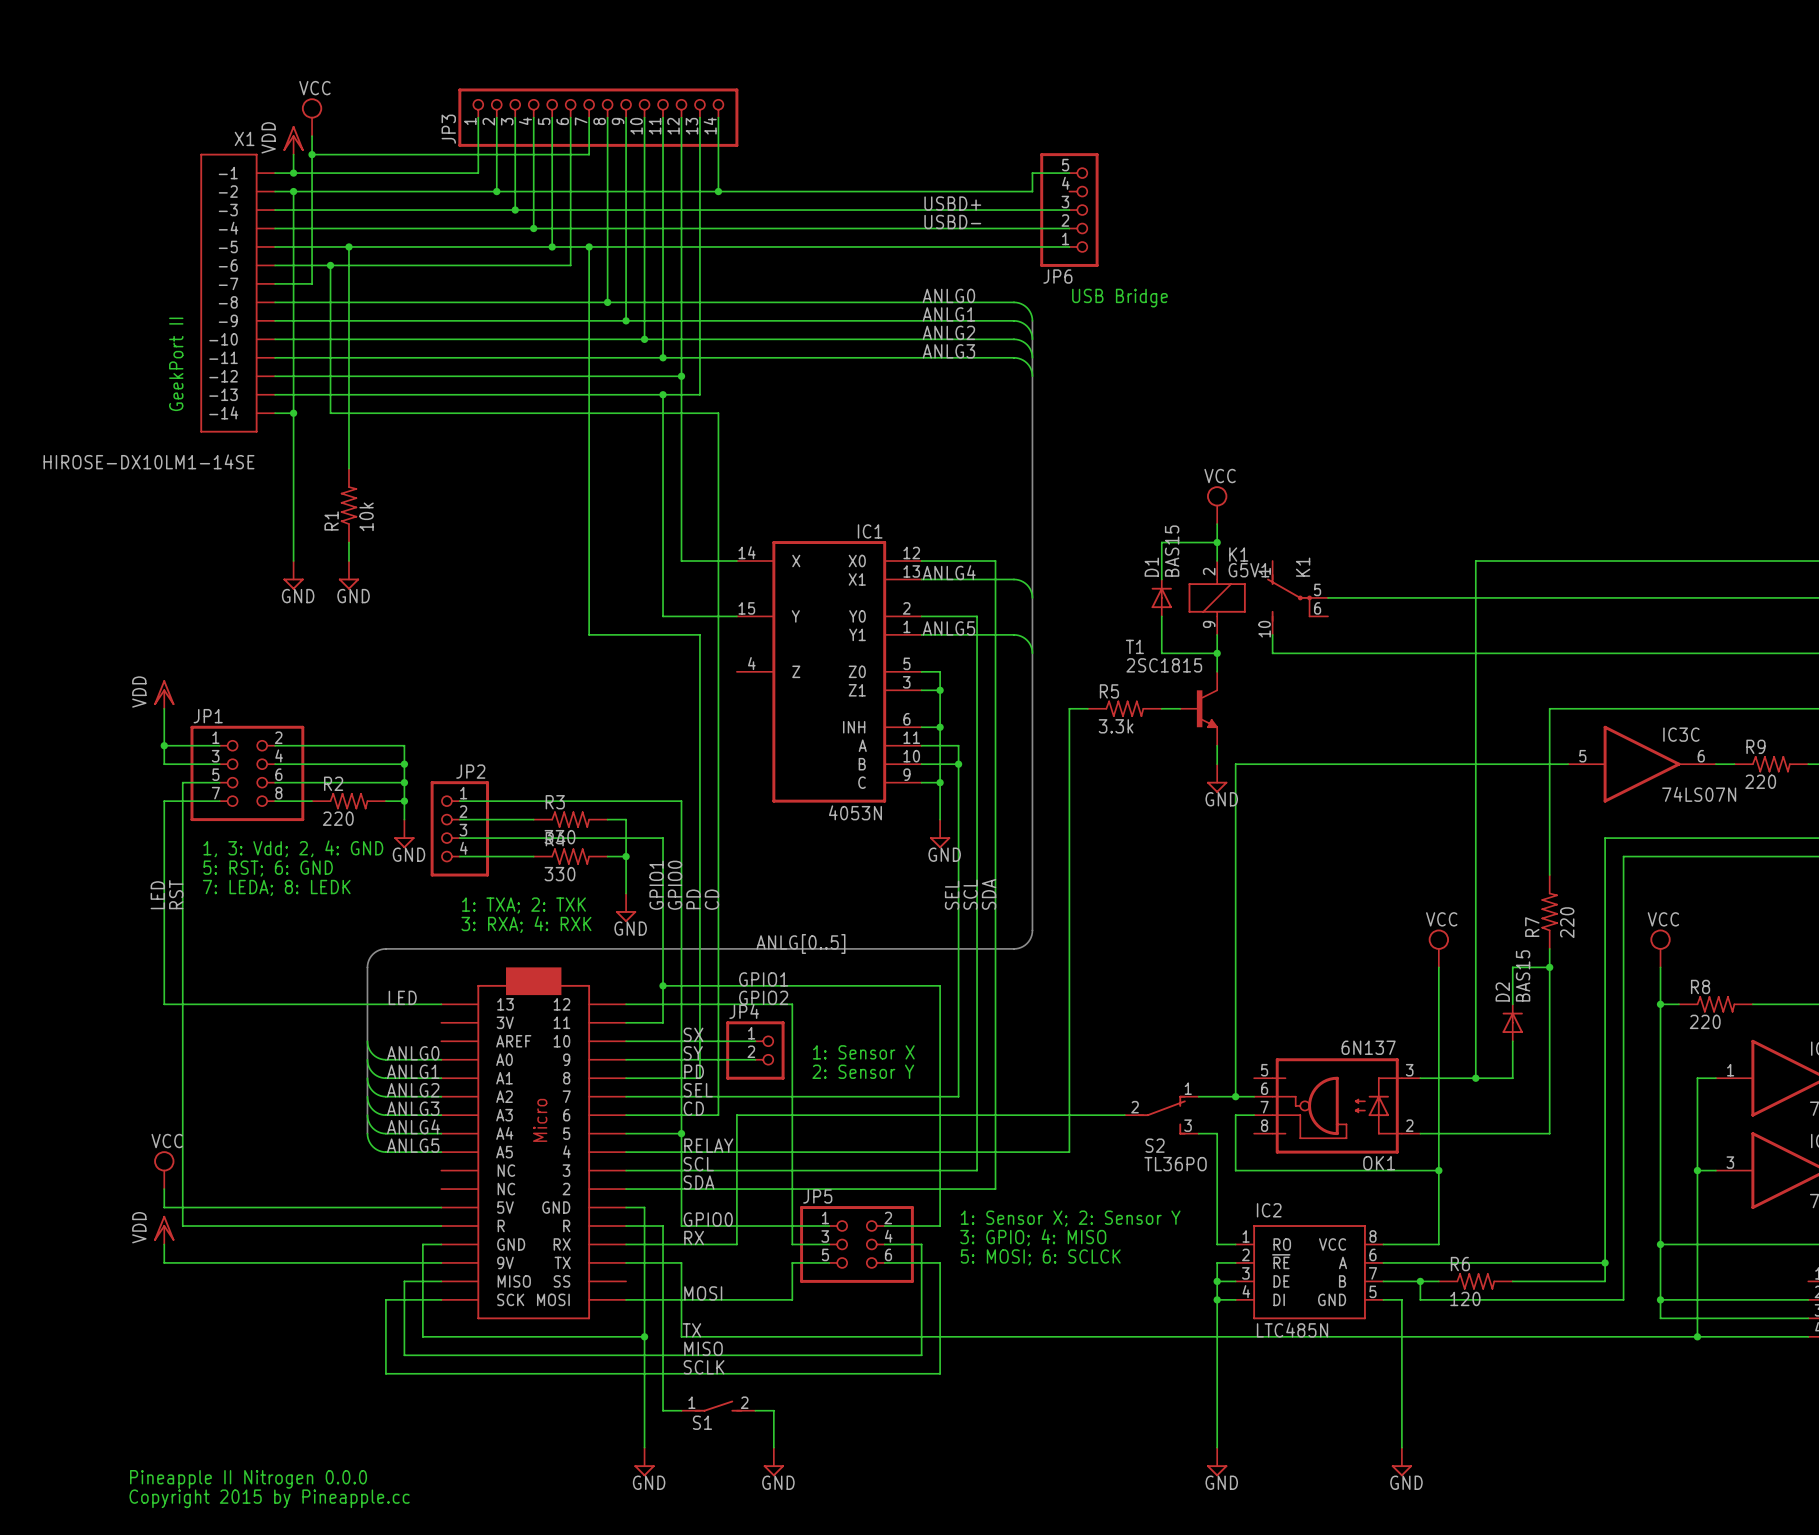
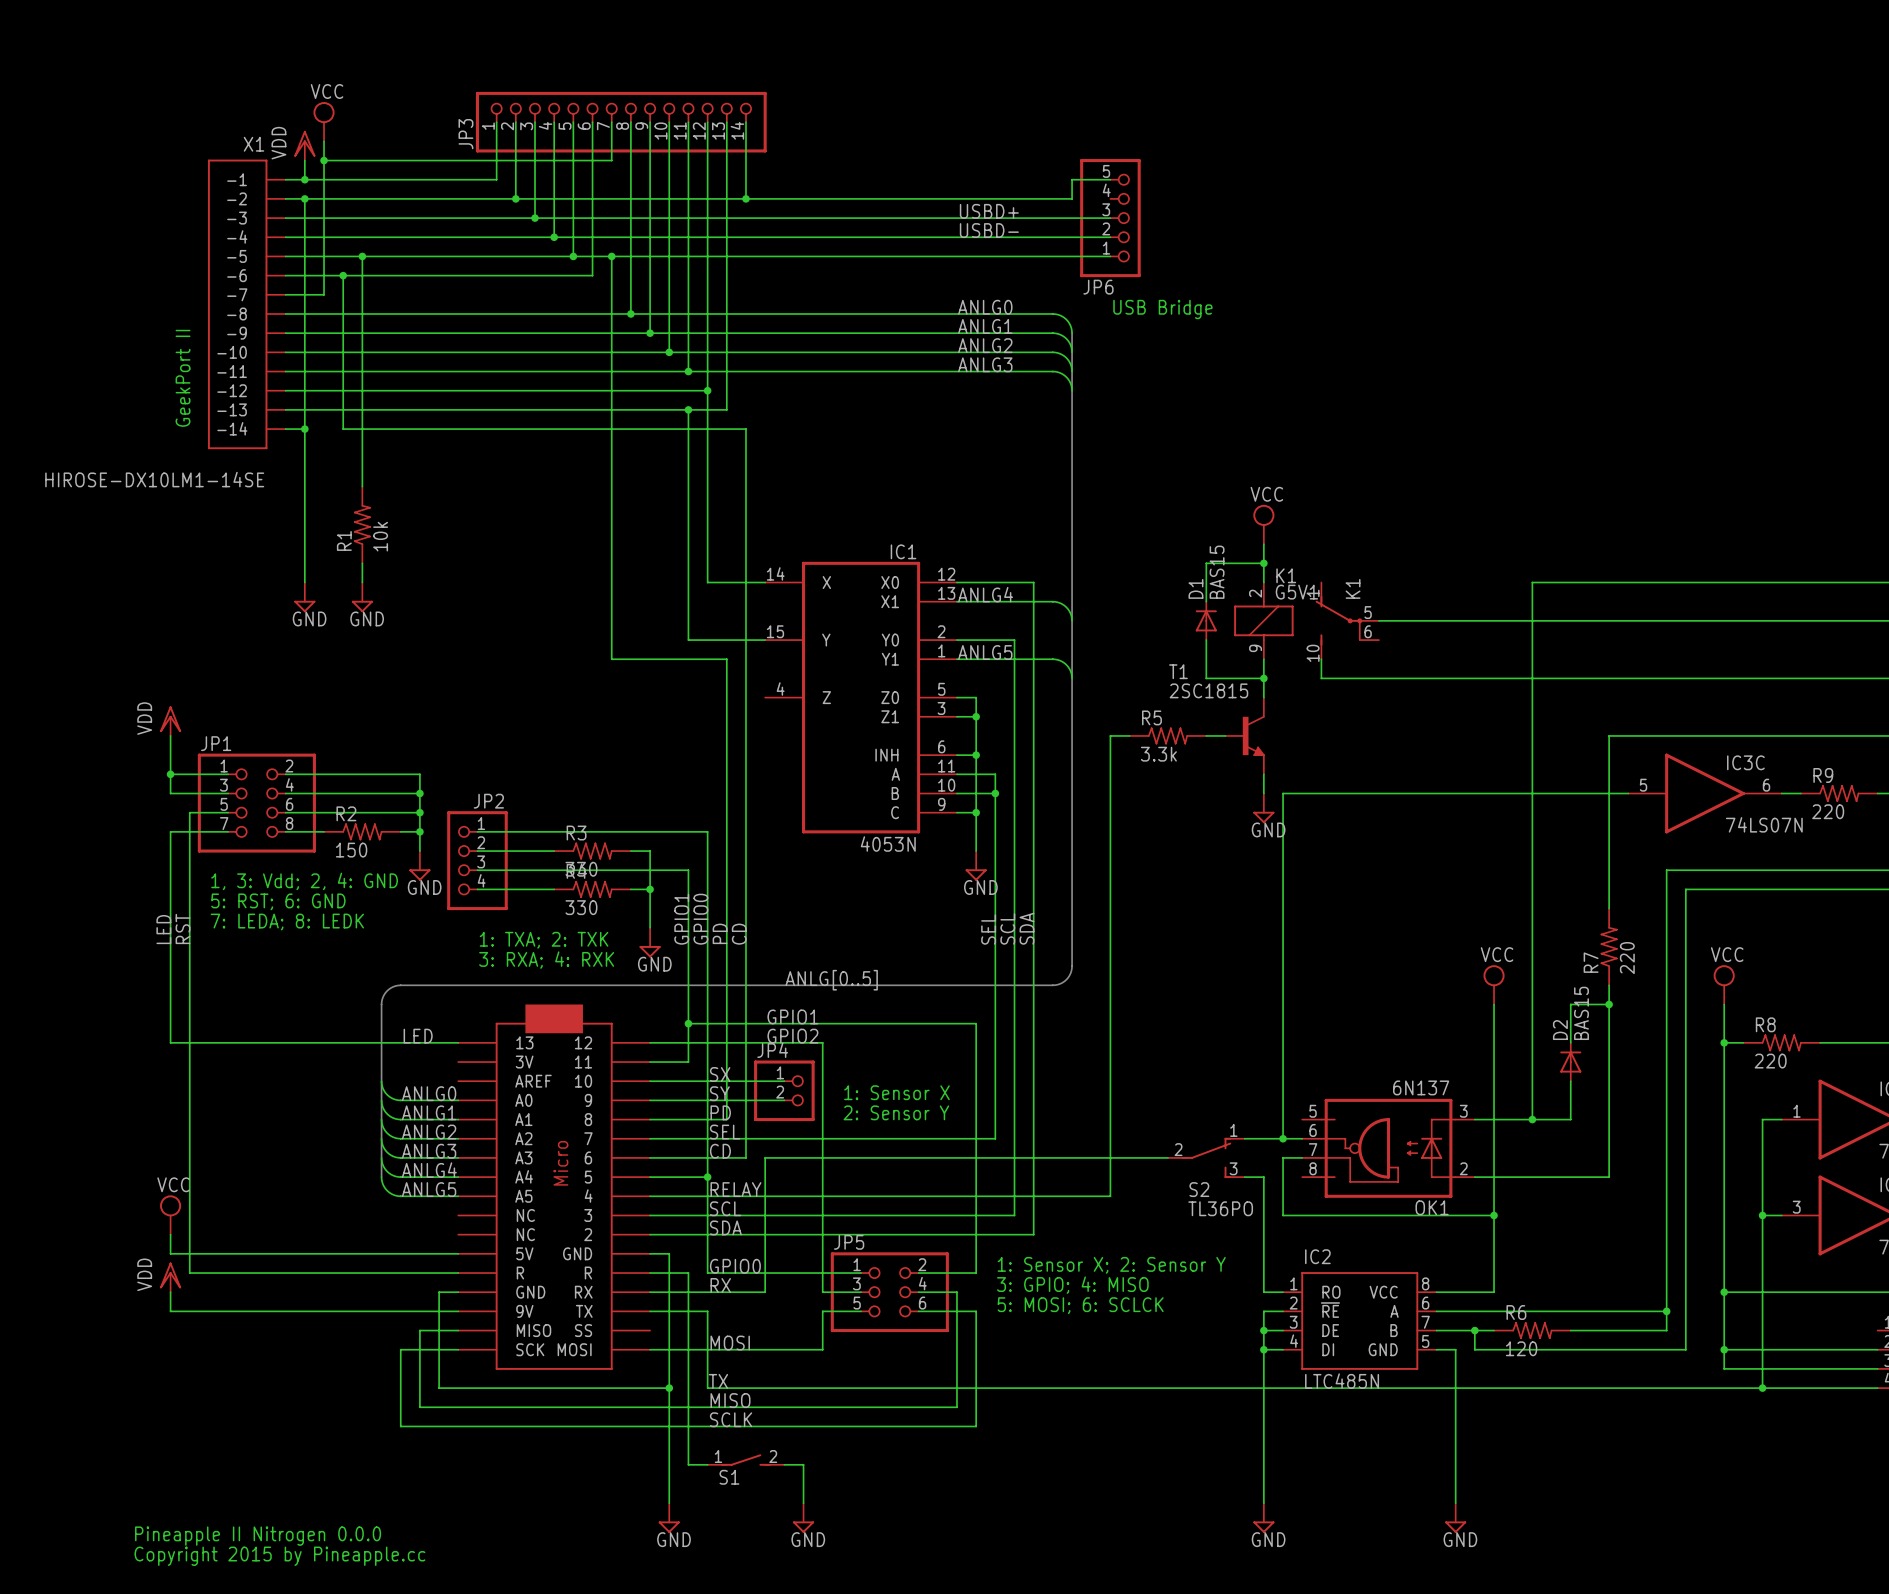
R2 value: 220 (338, 818) -> 150 (351, 850)

